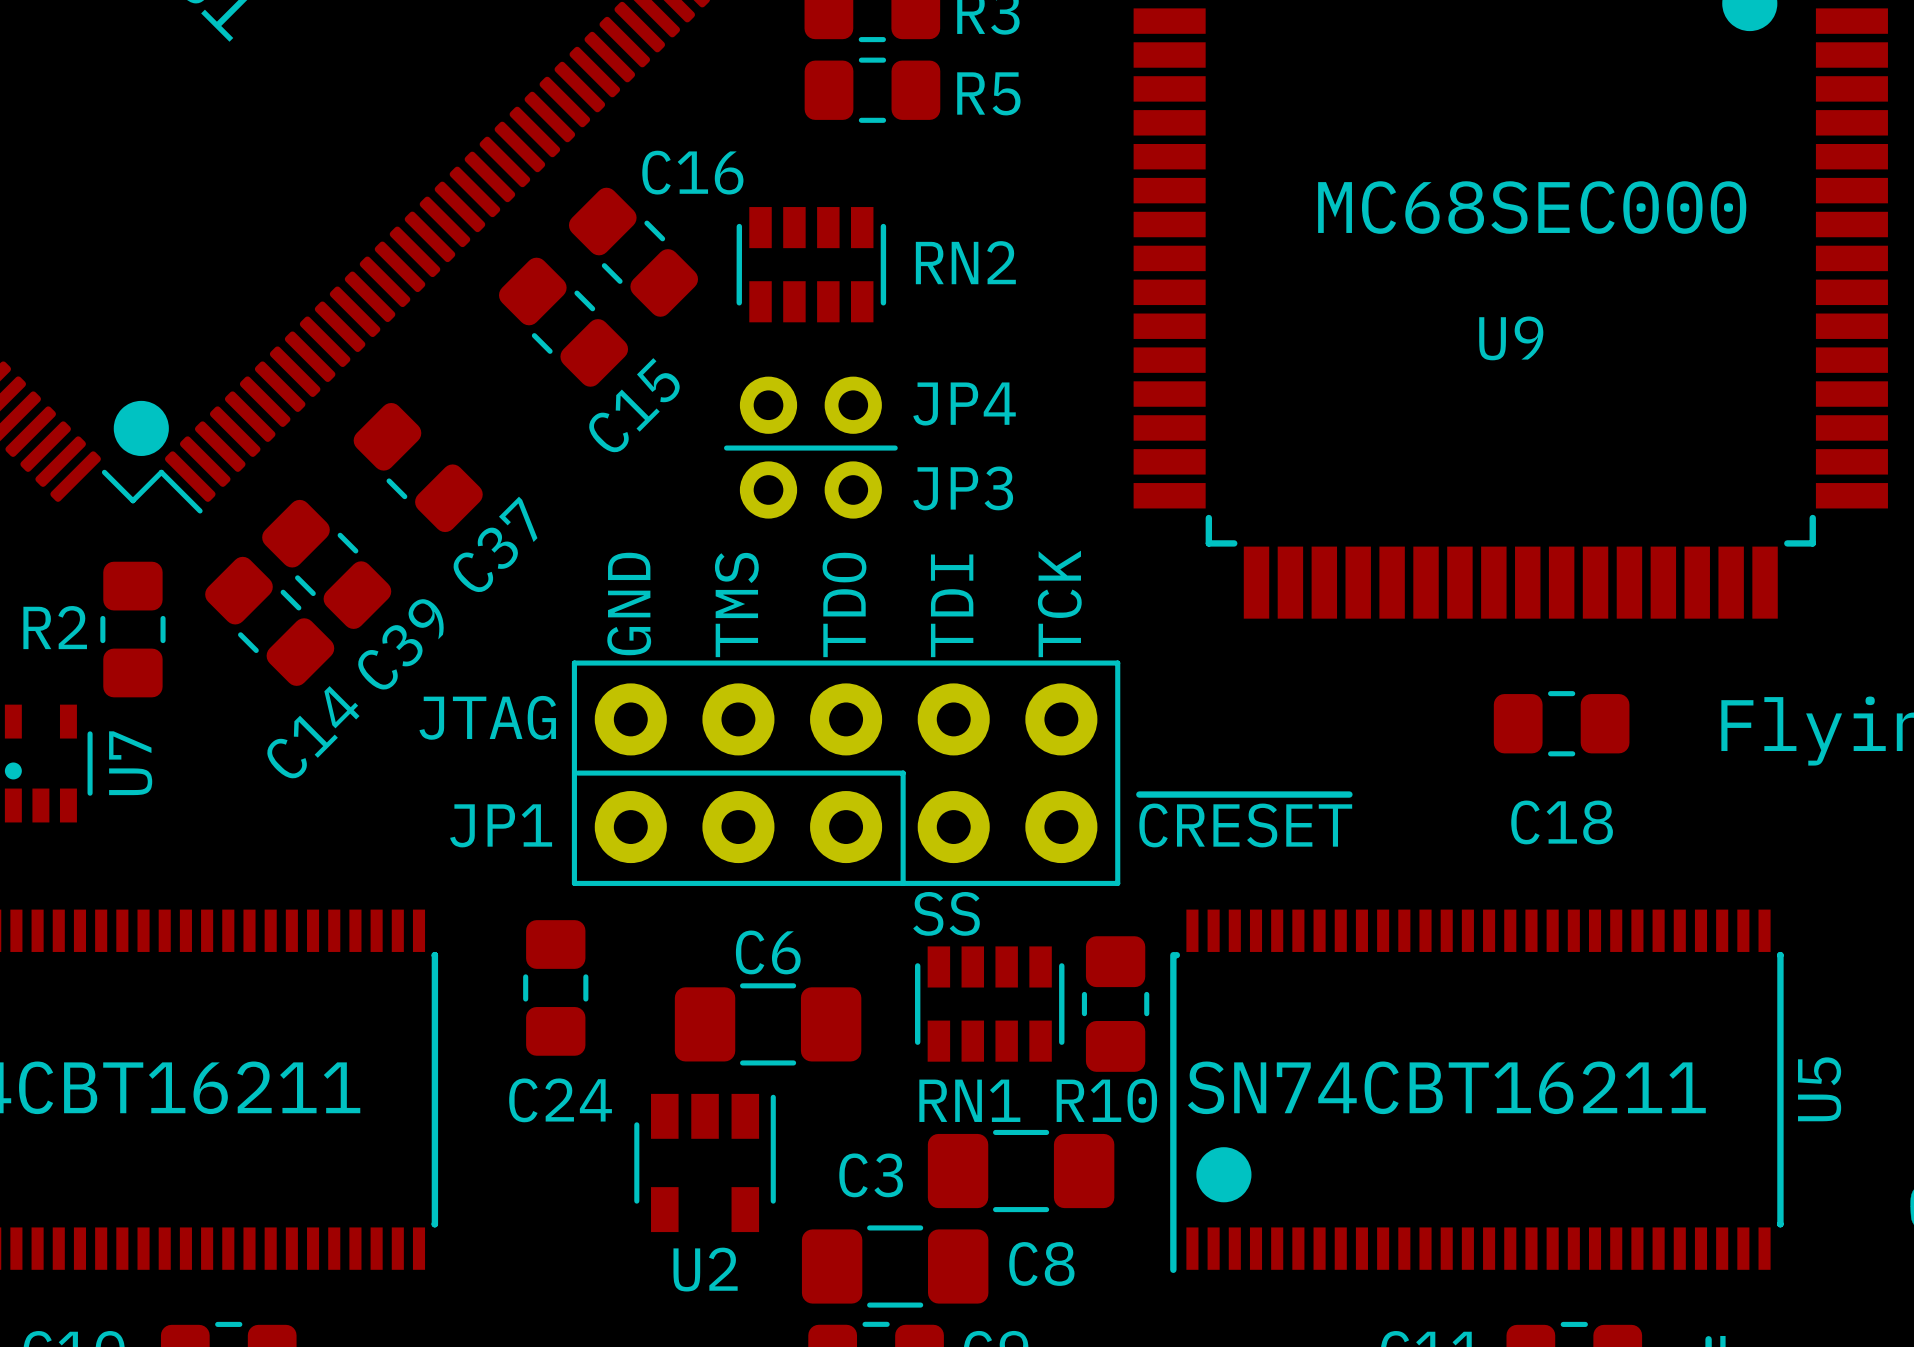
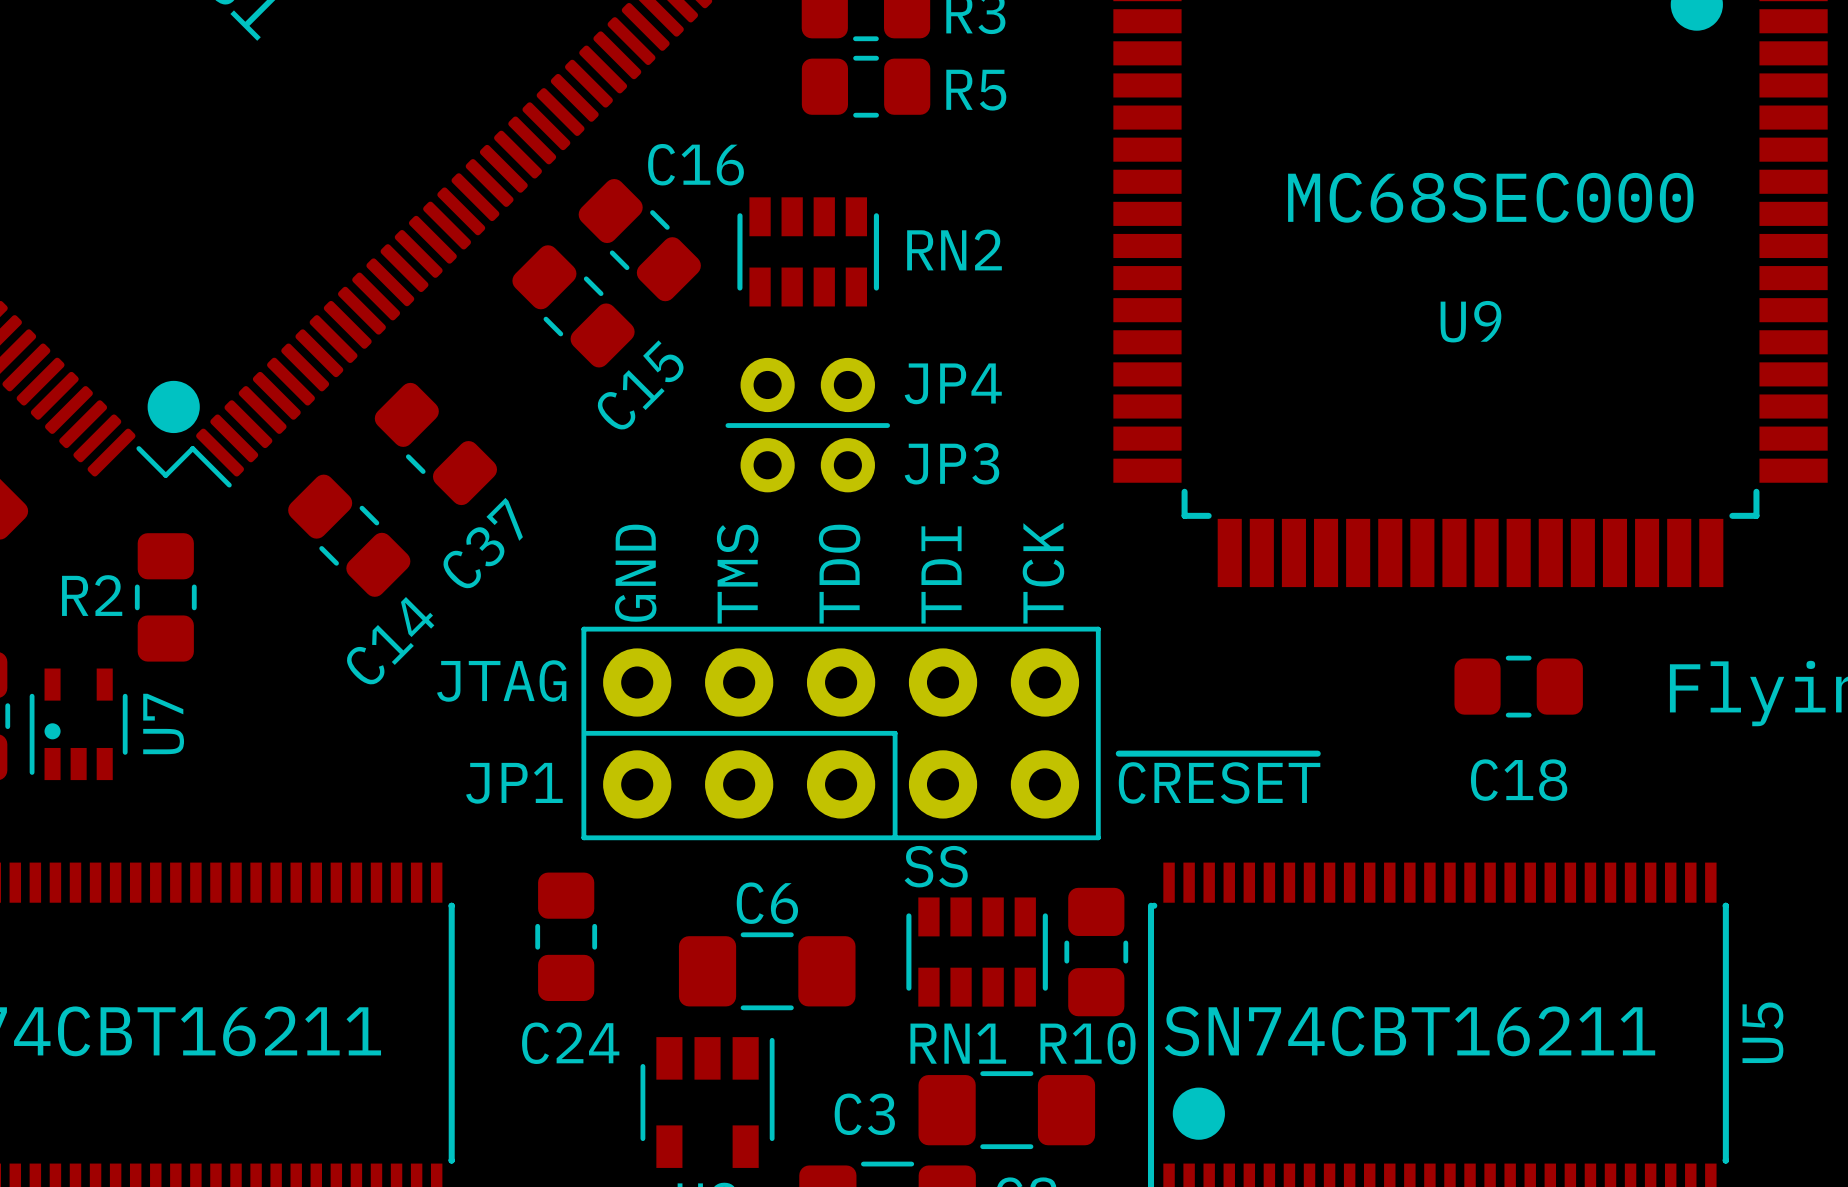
C37 name position: C37 (494, 544) -> C37 (482, 543)
C14: (269, 621) -> none
C39 name: C39 (400, 644) -> C14 (390, 641)

